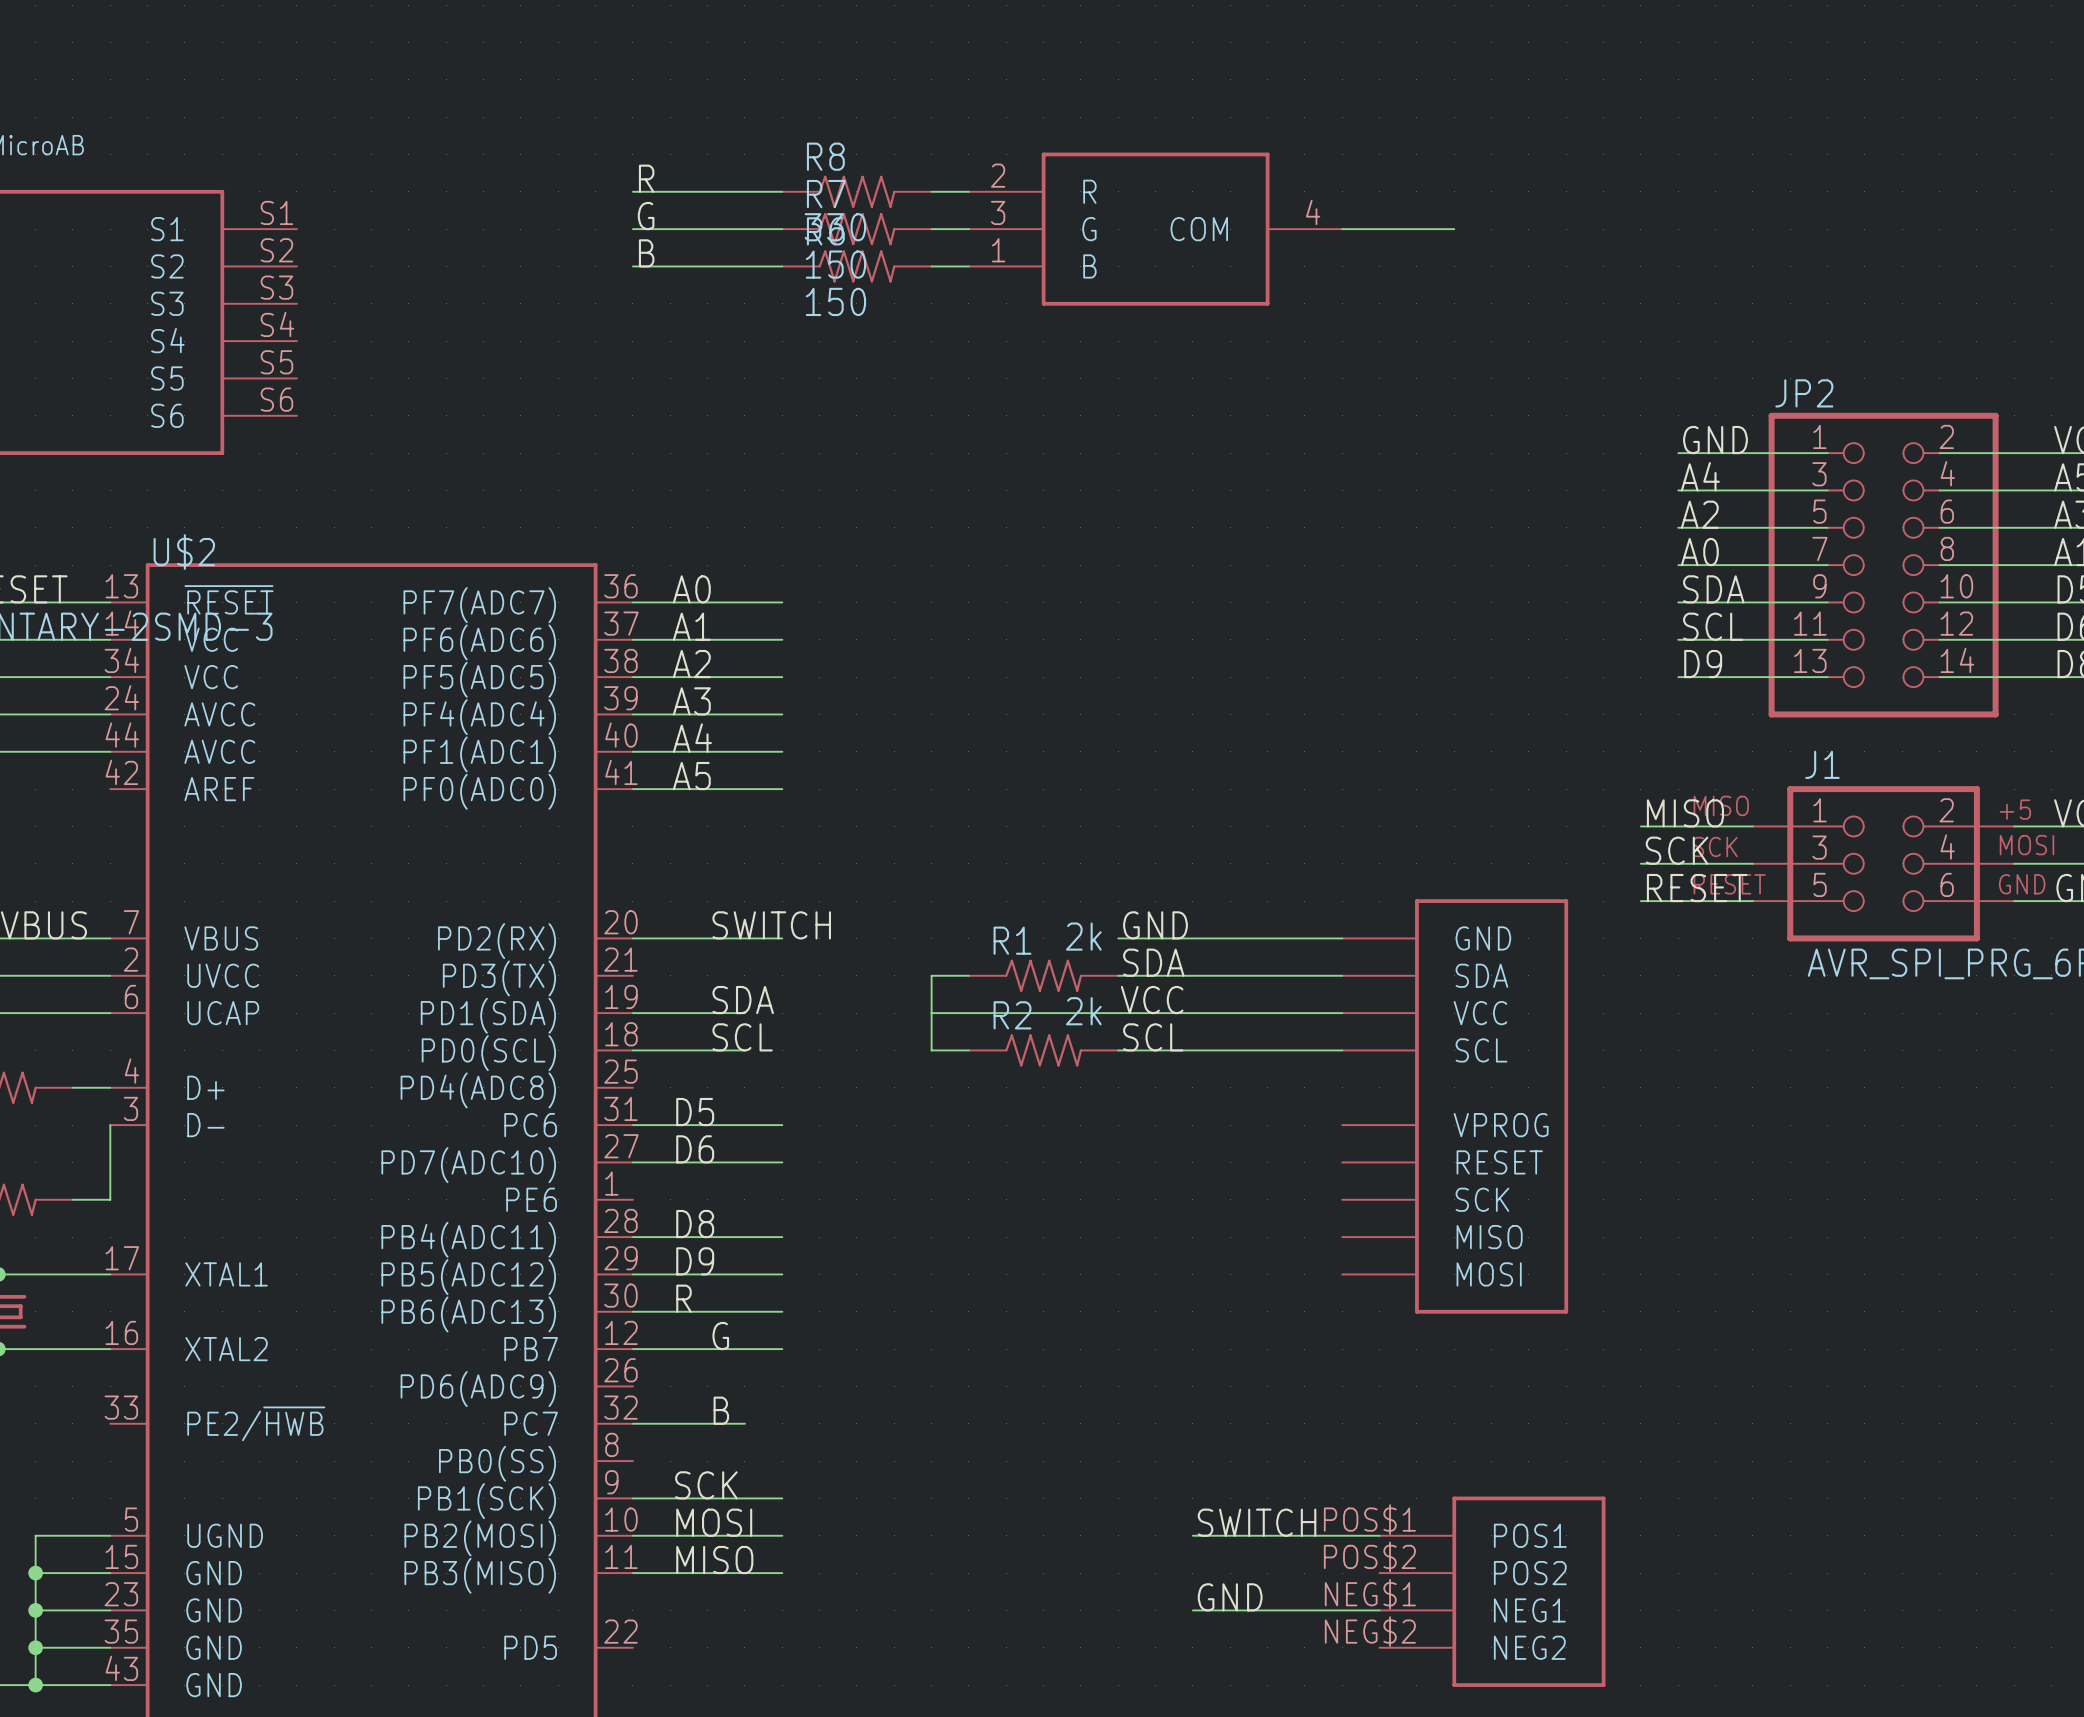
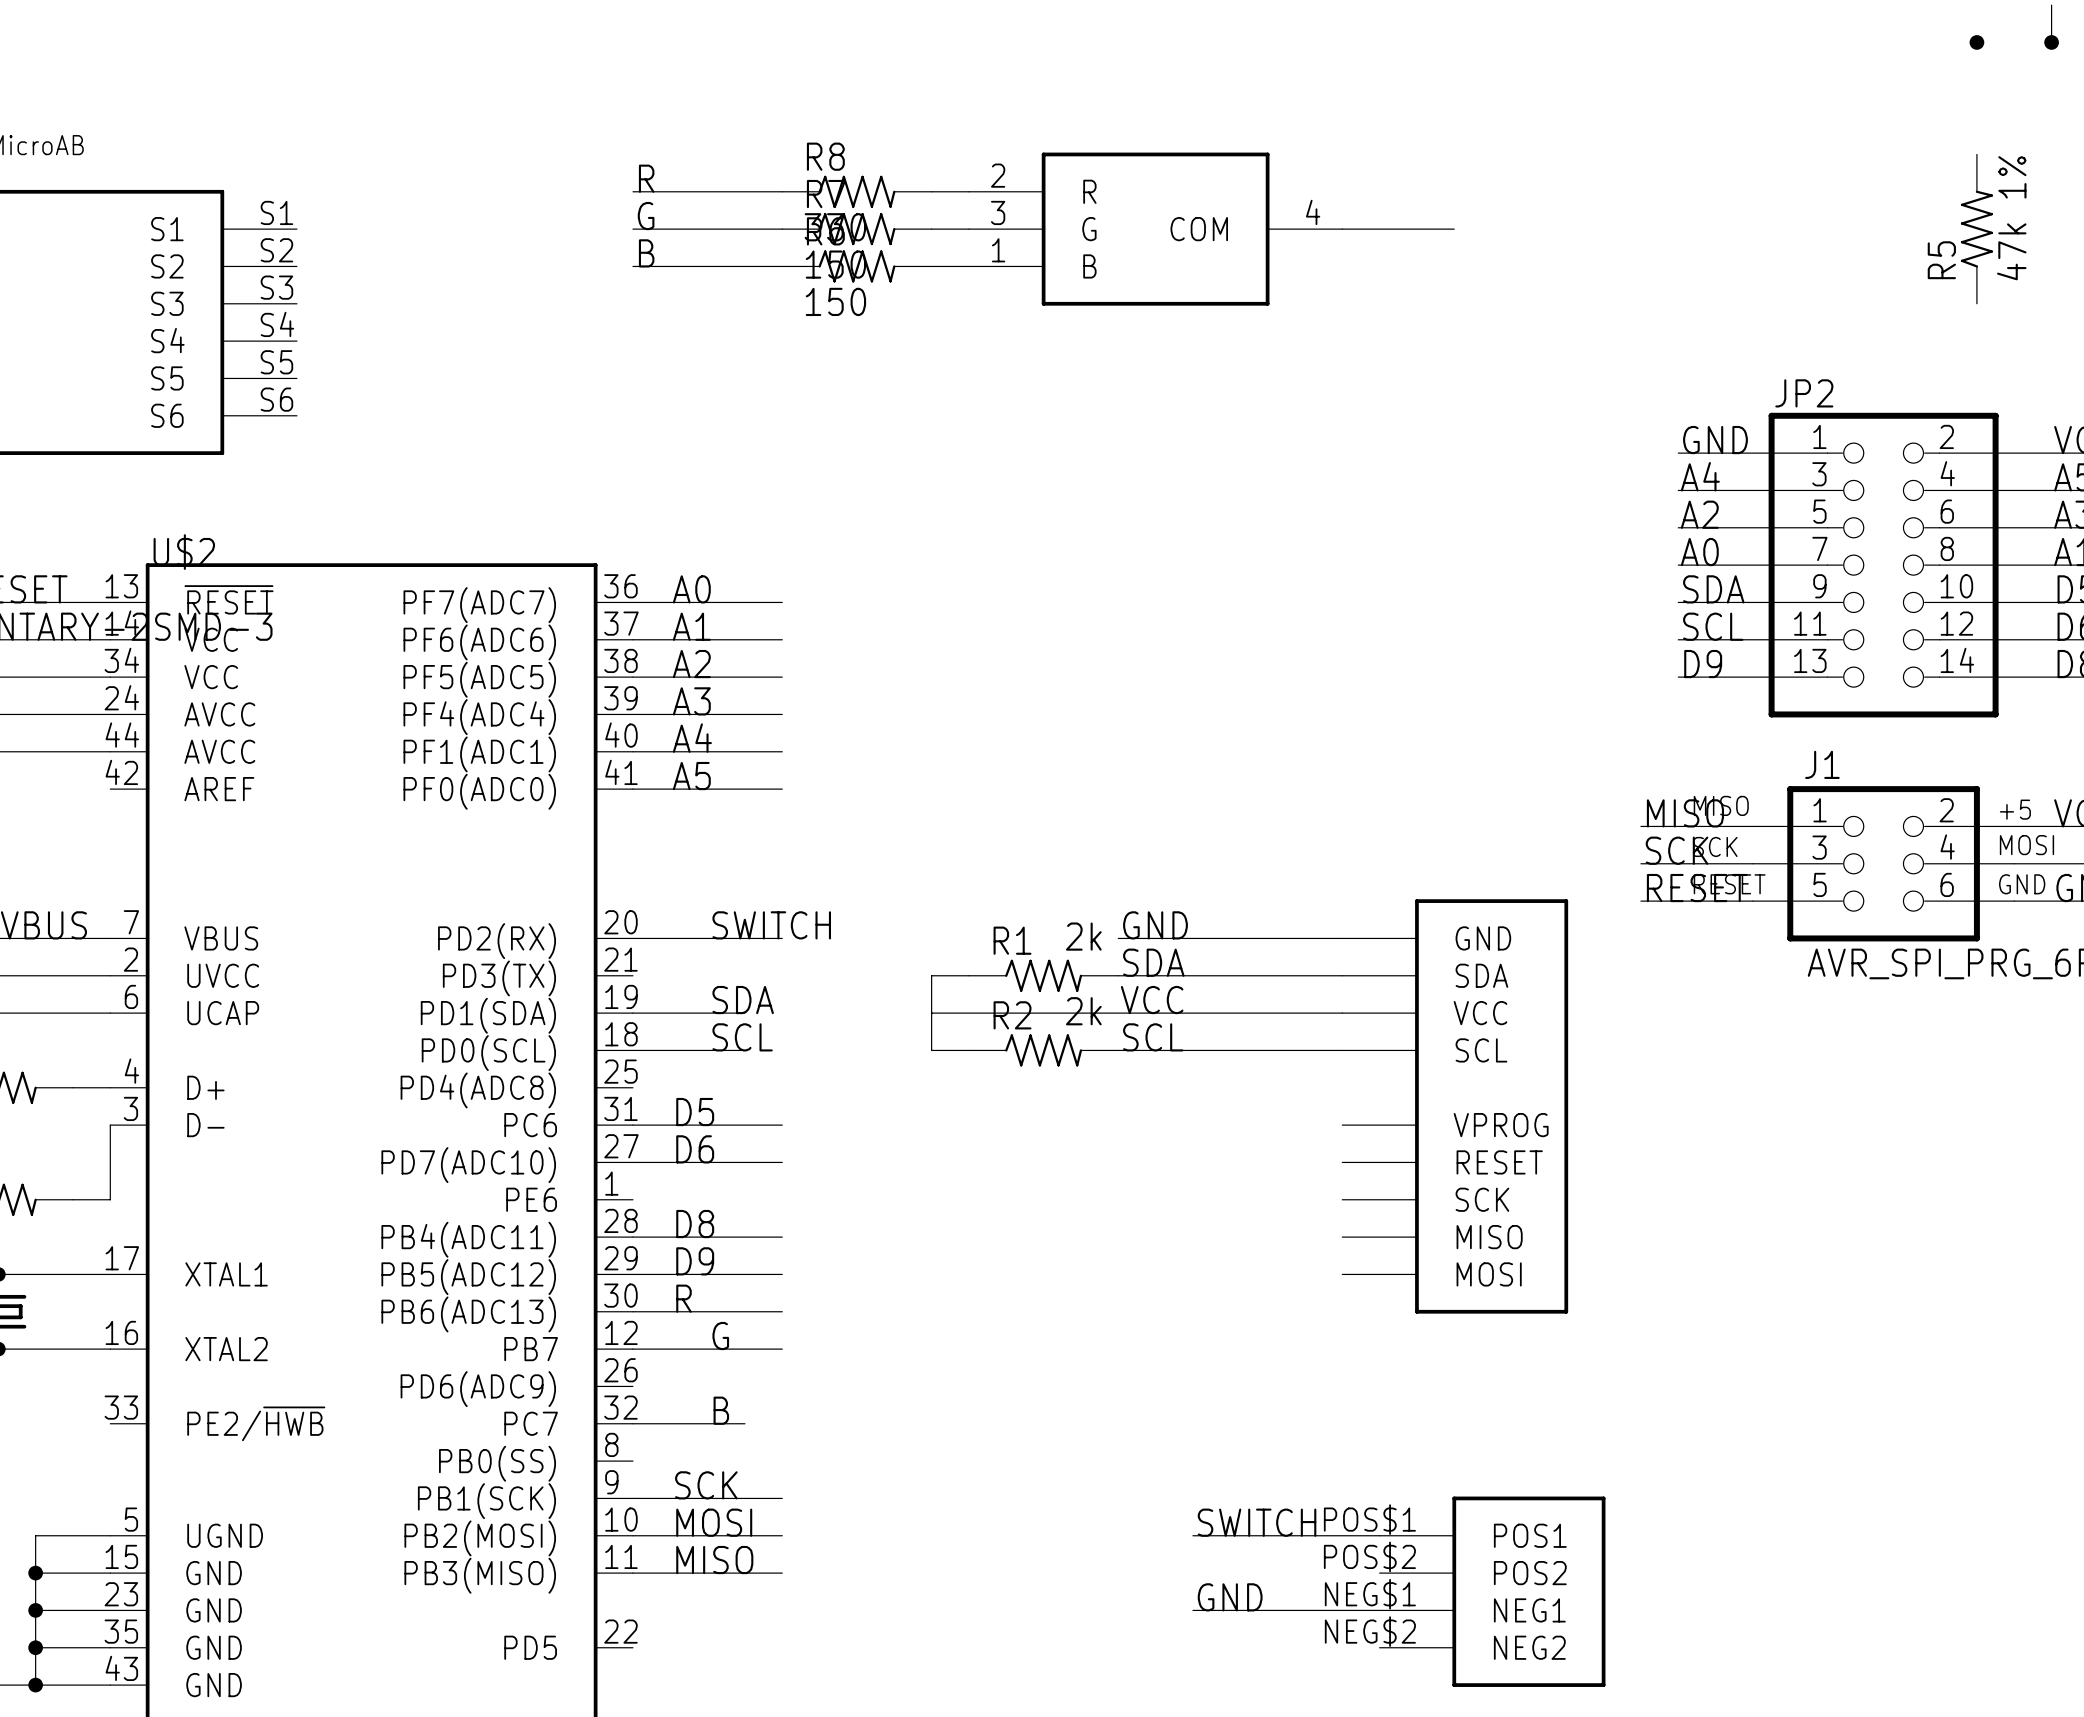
wire: none -> (2051, 5) (2051, 42)
junction: none -> (1976, 42)
junction: none -> (2051, 42)
R5: none -> 47k 1% (1976, 229)

